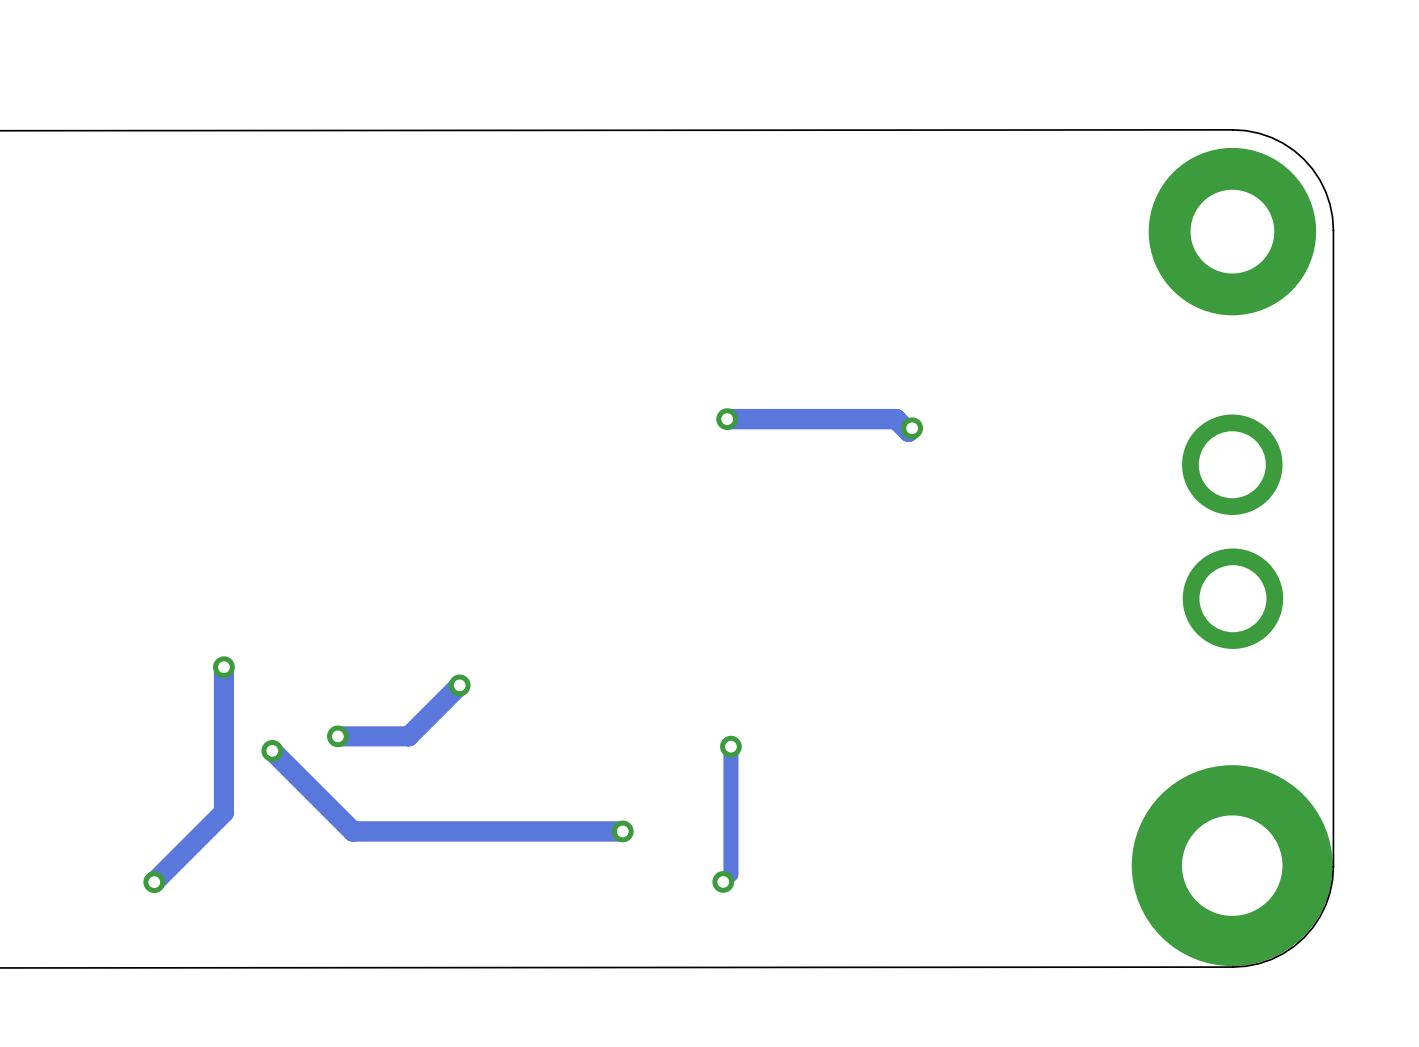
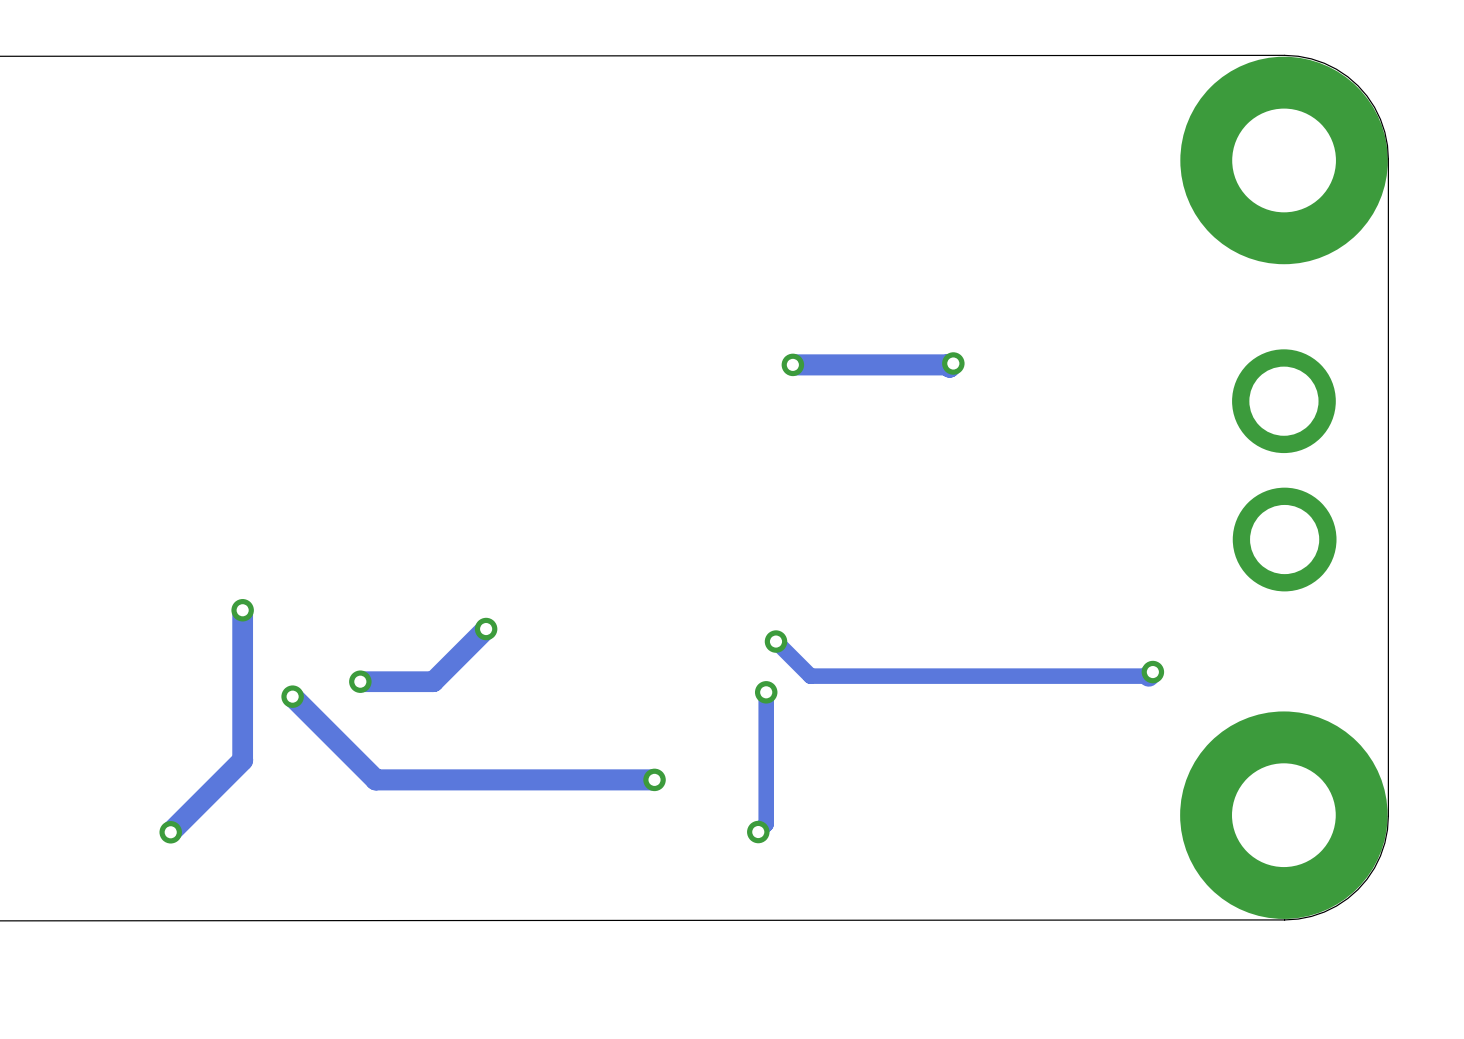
via size: [1148, 147, 1317, 316] -> [1180, 56, 1388, 265]
track: (727, 419) (895, 419) (906, 429) -> (792, 364) (947, 364)
via position: (727, 419) -> (792, 364)
track: none -> (776, 641) (810, 676) (1148, 676) (1152, 672)
via: none -> (776, 641)
via: none -> (1152, 672)

